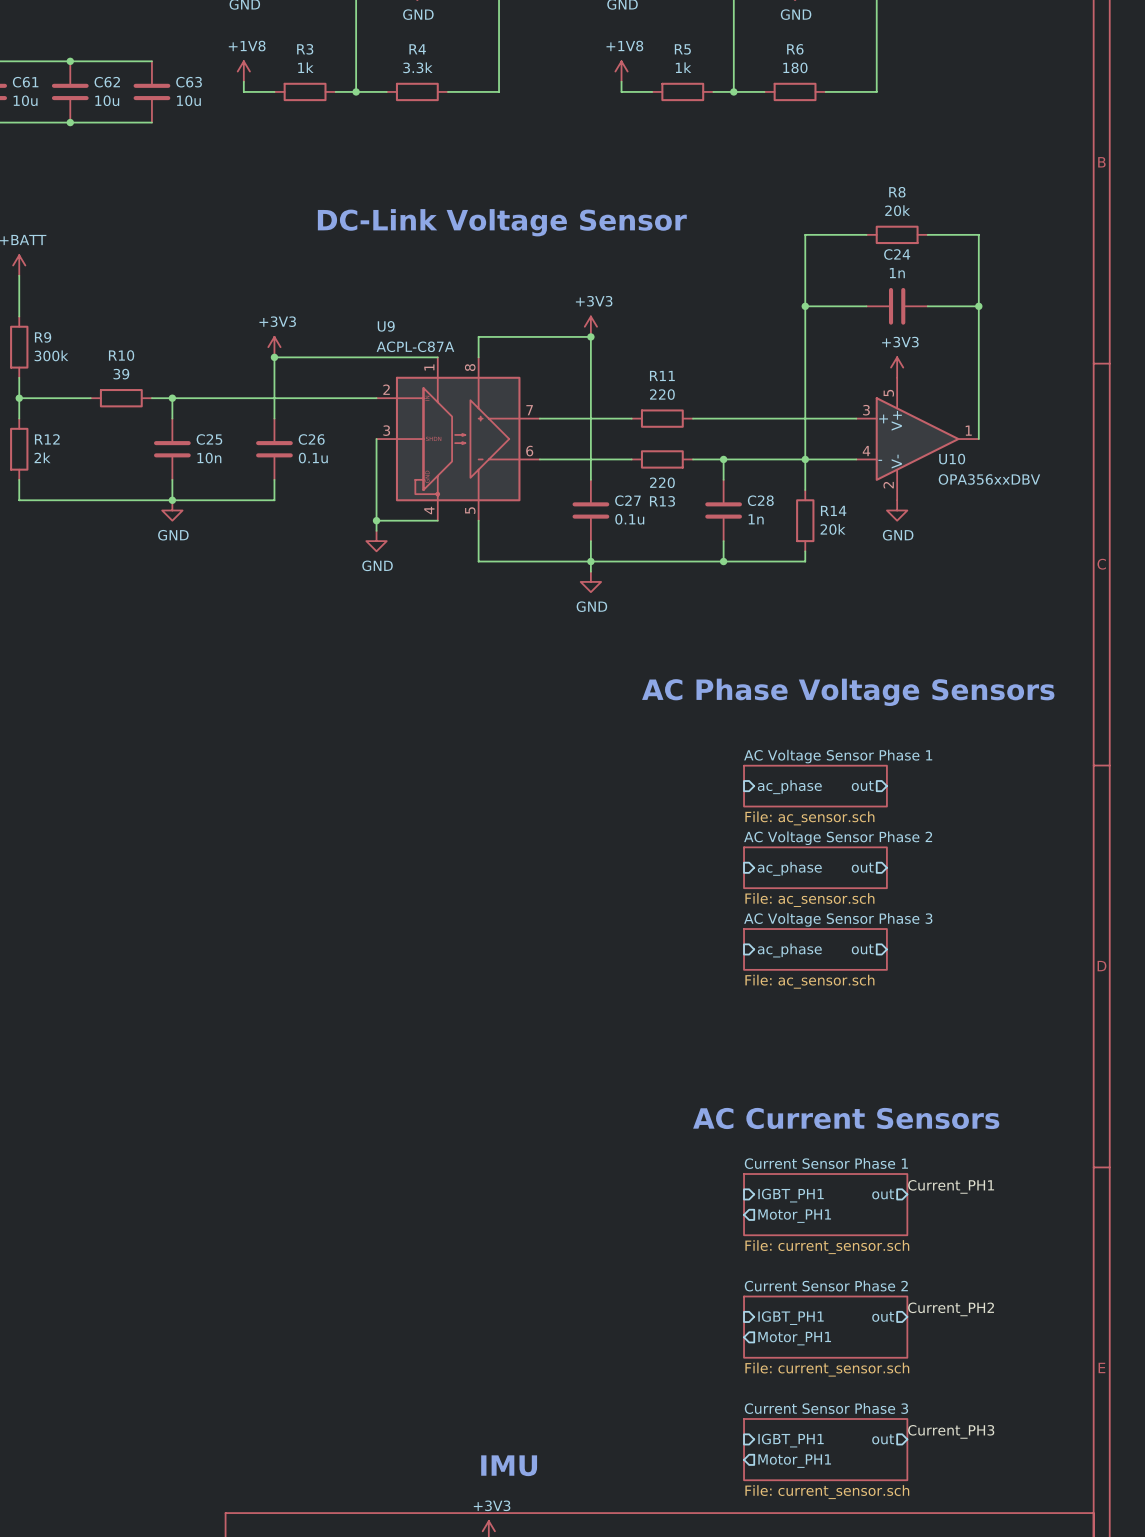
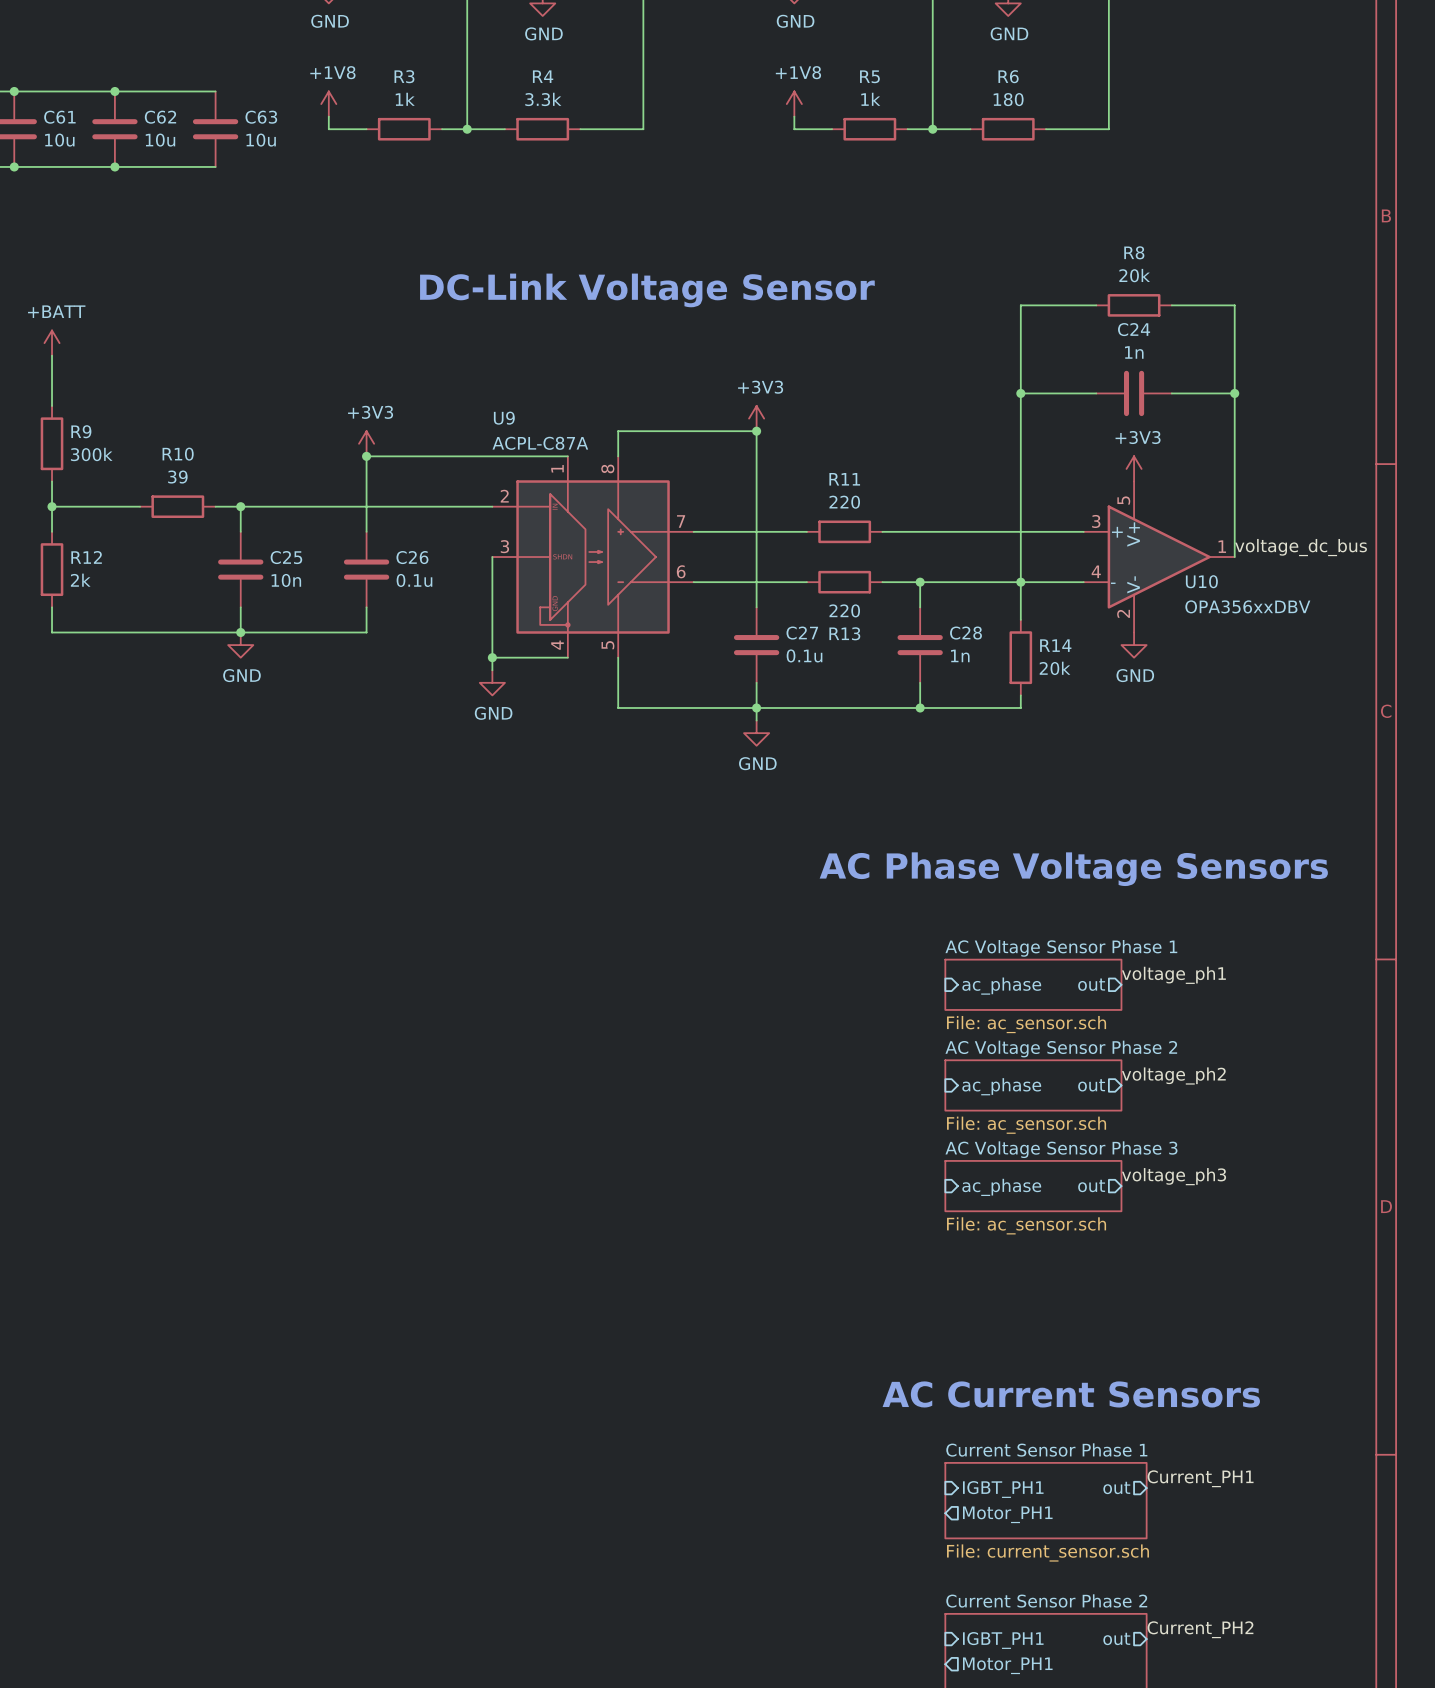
label: none -> voltage_dc_bus (1301, 547)
label: none -> voltage_ph1 (1173, 975)
label: none -> voltage_ph2 (1173, 1075)
label: none -> voltage_ph3 (1174, 1176)

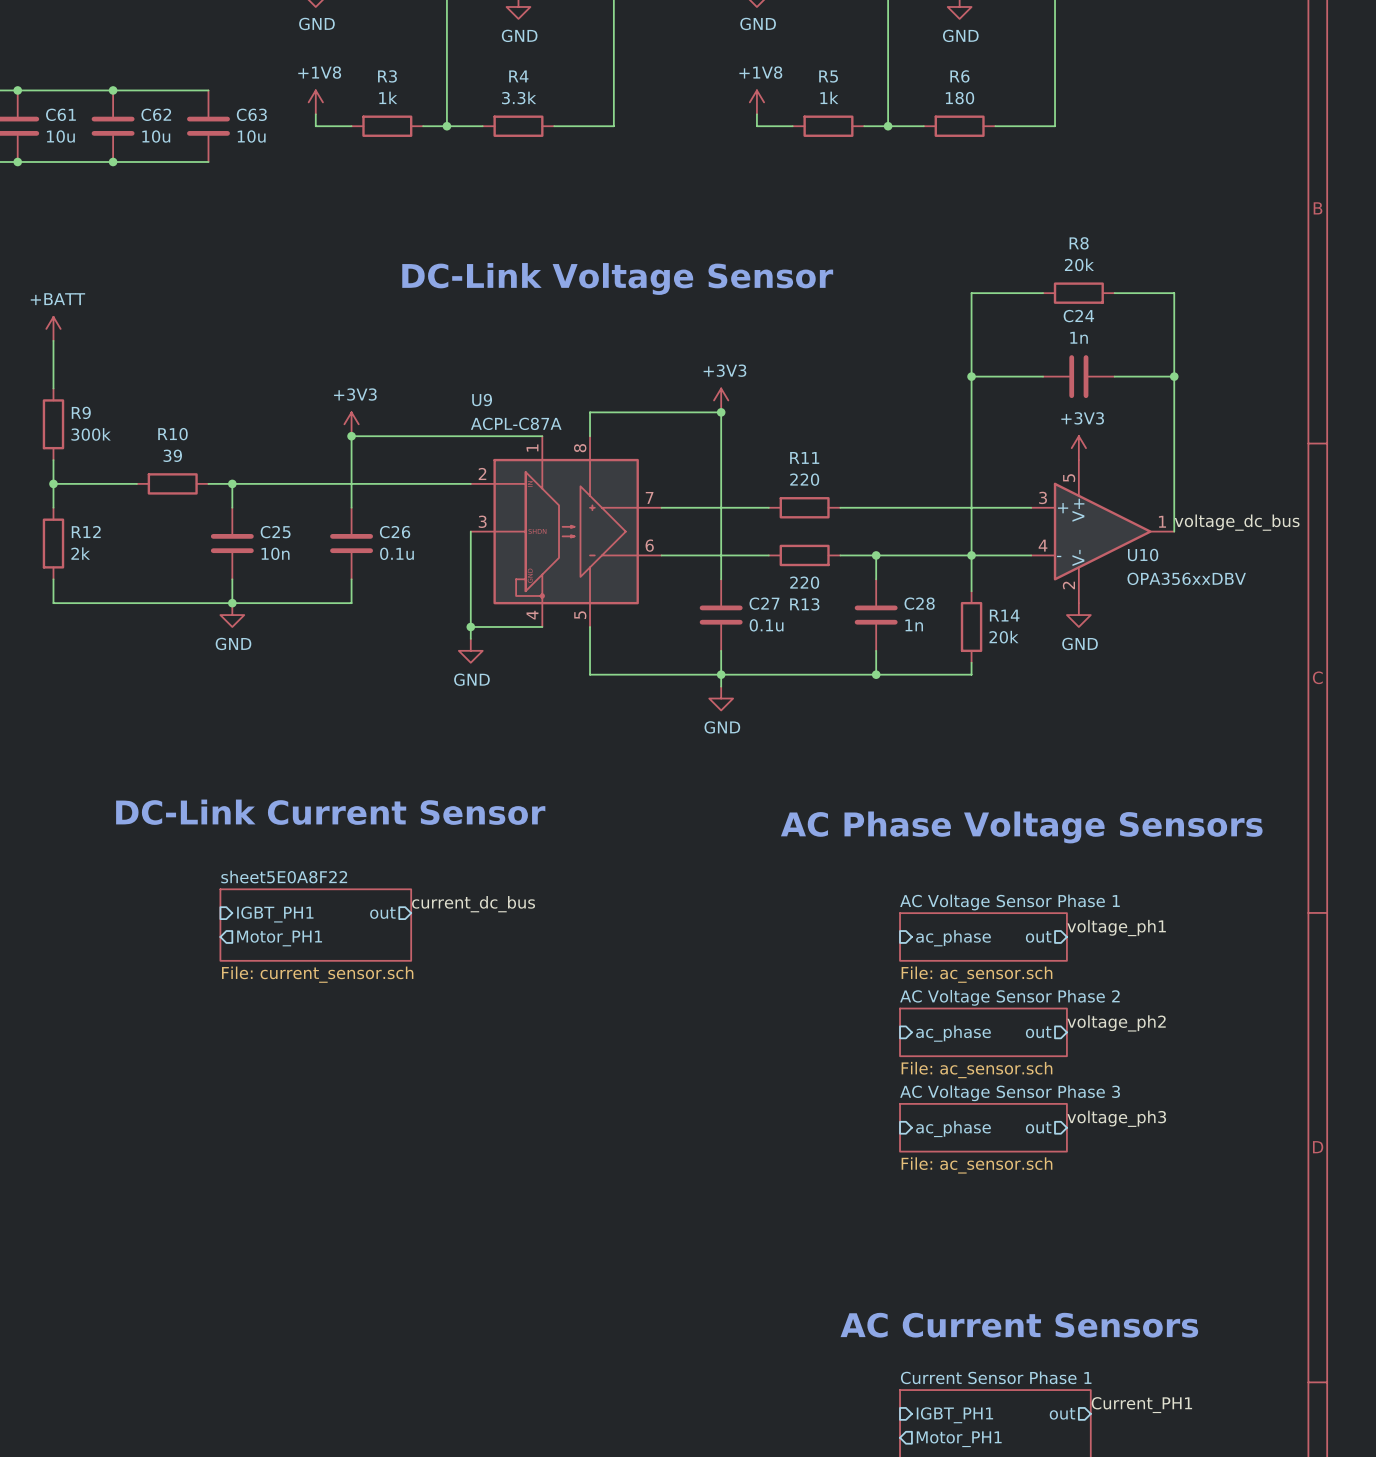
text: none -> DC-Link Current Sensor (330, 812)
label: none -> current_dc_bus (473, 904)
sheet pin: none -> out (382, 913)
sheet pin: none -> IGBT_PH1 (275, 914)
sheet sheet5E0A8F22: none -> File: current_sensor.sch (315, 925)
sheet pin: none -> Motor_PH1 (279, 938)

